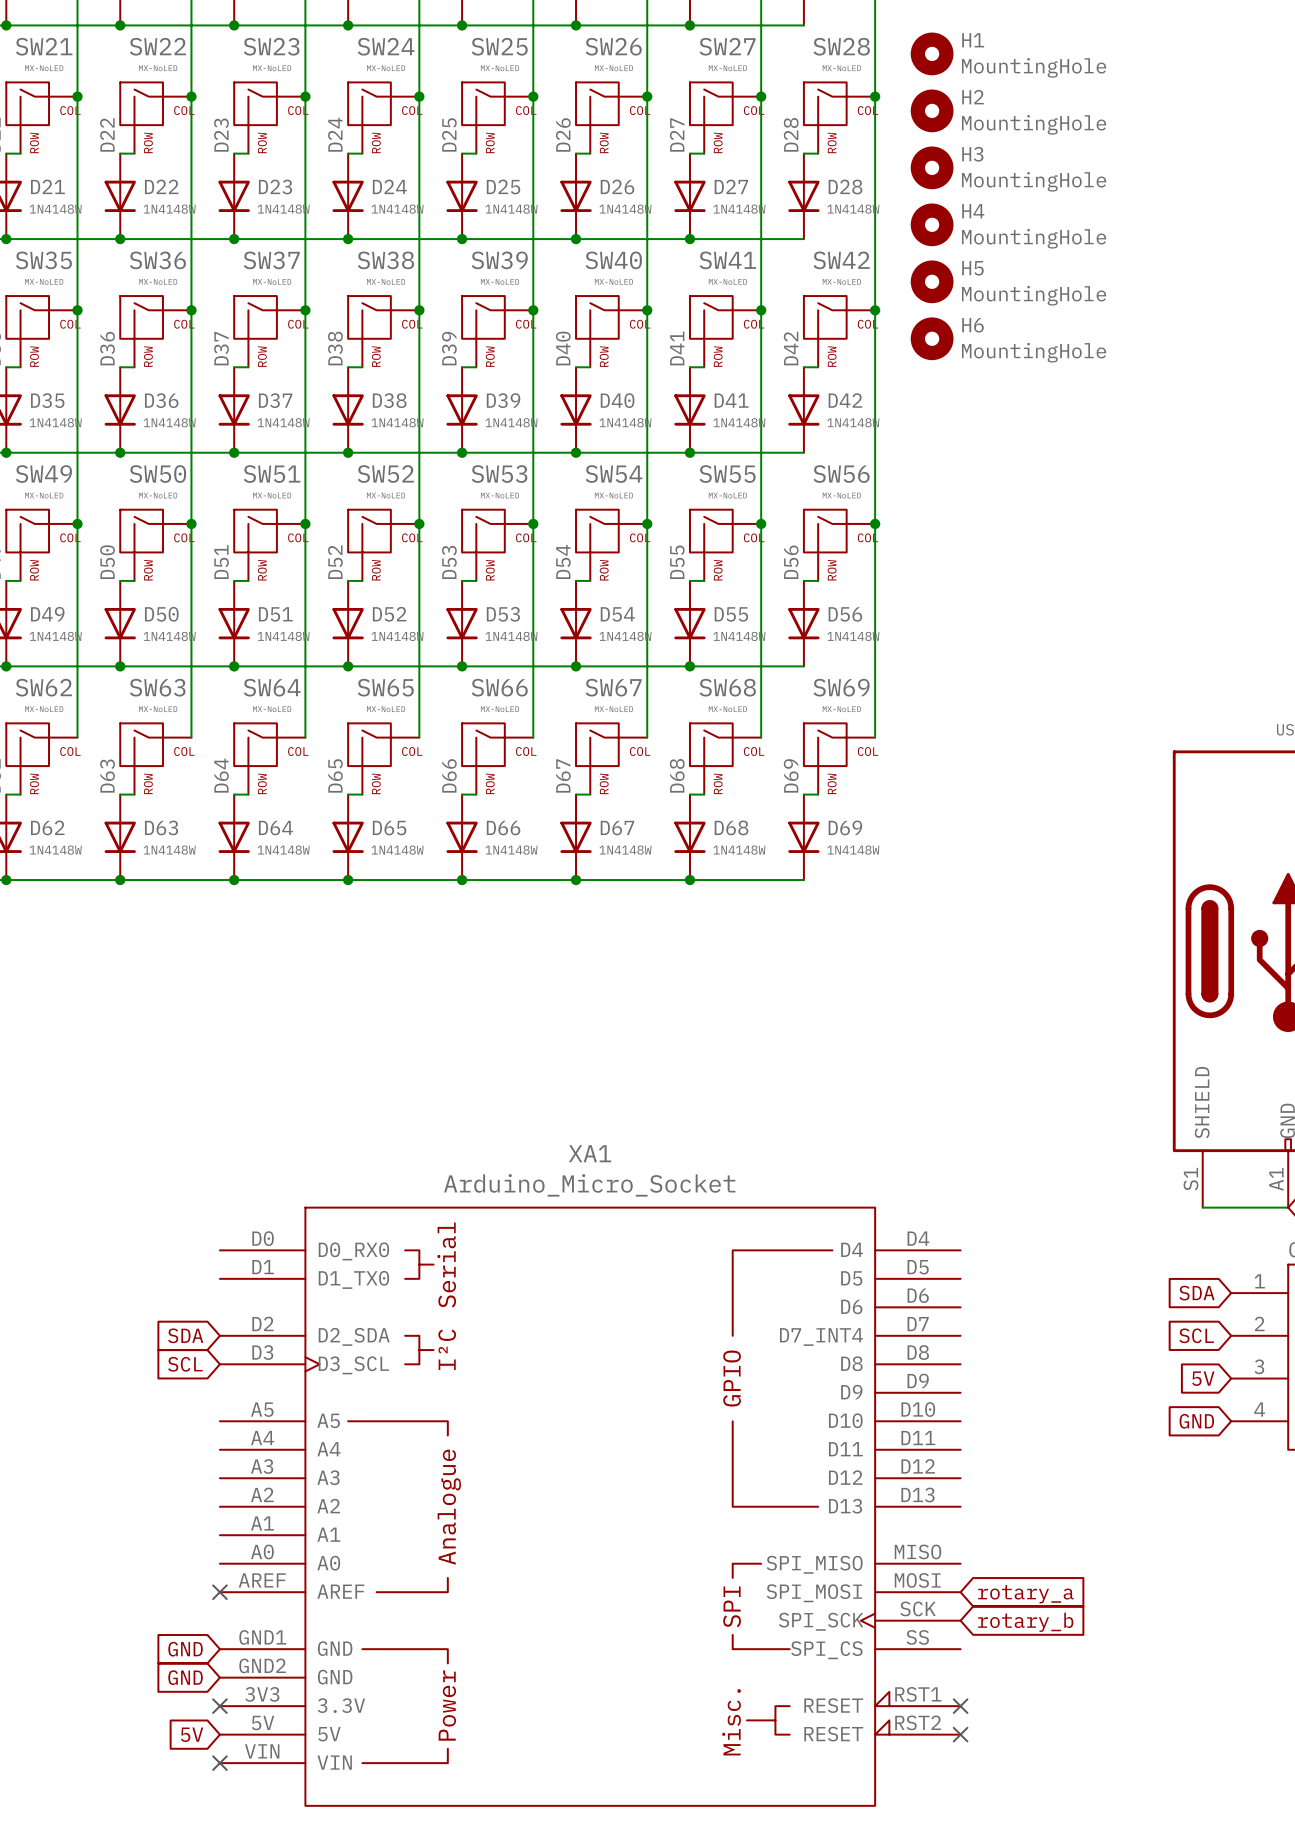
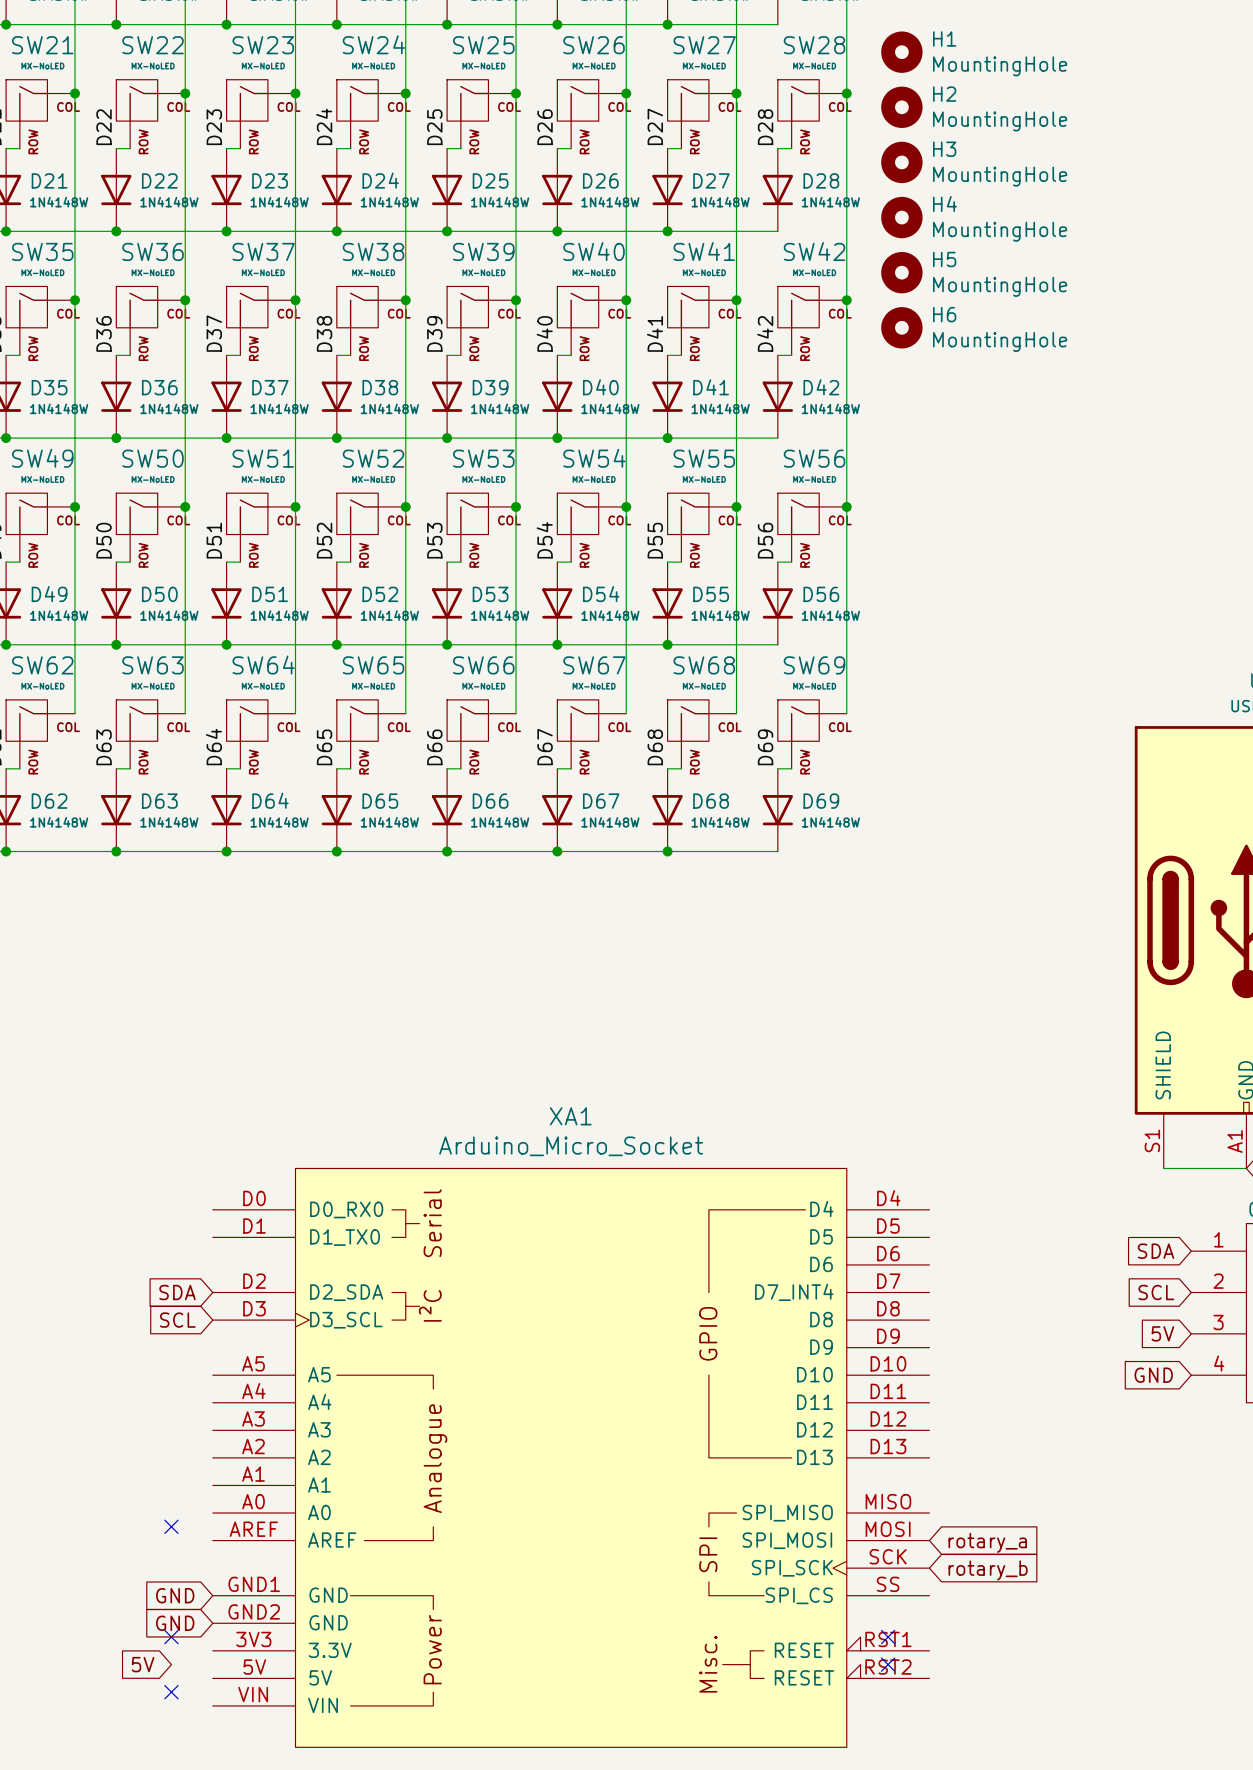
no-connect mark position: (219, 1592) -> (171, 1526)
no-connect mark: none -> (171, 1637)
no-connect mark: none -> (888, 1637)
no-connect mark: (219, 1706) -> none
no-connect mark: (960, 1706) -> none
no-connect mark: none -> (888, 1664)
global label position: 5V (192, 1734) -> 5V (143, 1664)
no-connect mark: (960, 1734) -> none
no-connect mark: none -> (171, 1692)
no-connect mark: (219, 1763) -> none

